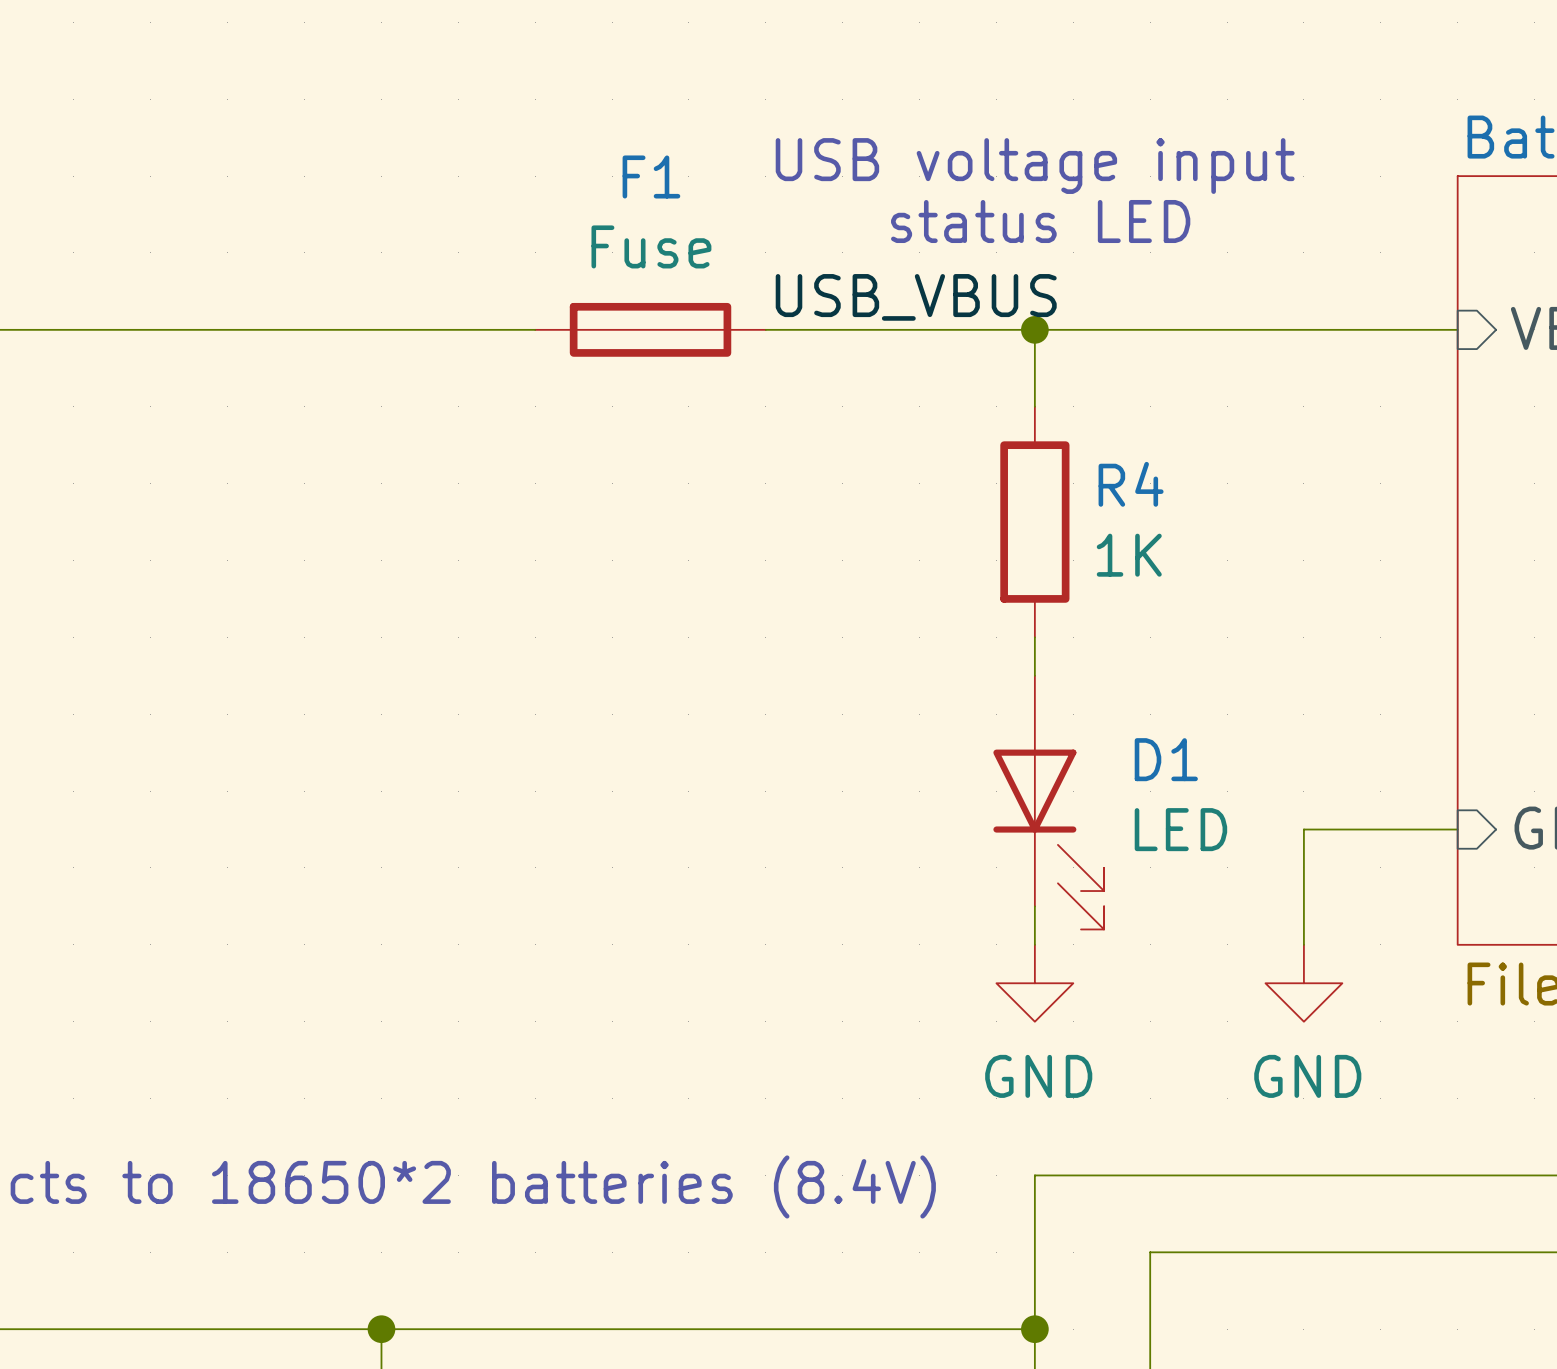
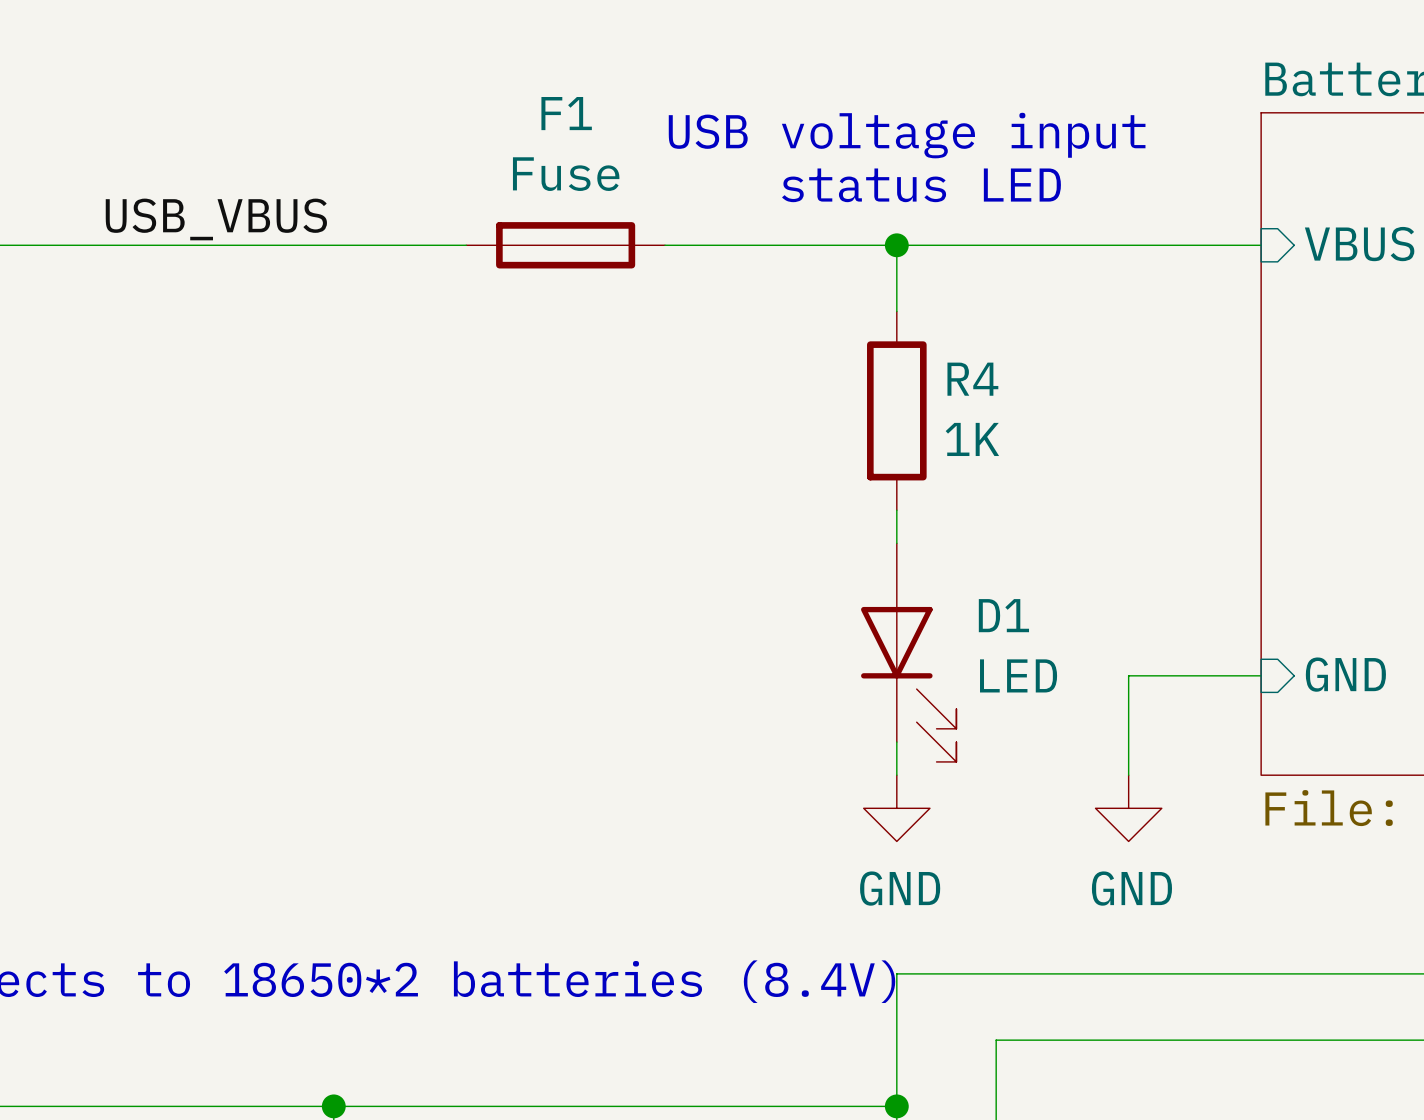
text position: USB voltage input (1035, 166) -> USB voltage input (907, 135)
text position: status LED (1040, 221) -> status LED (921, 185)
label position: USB_VBUS (916, 297) -> USB_VBUS (216, 219)

